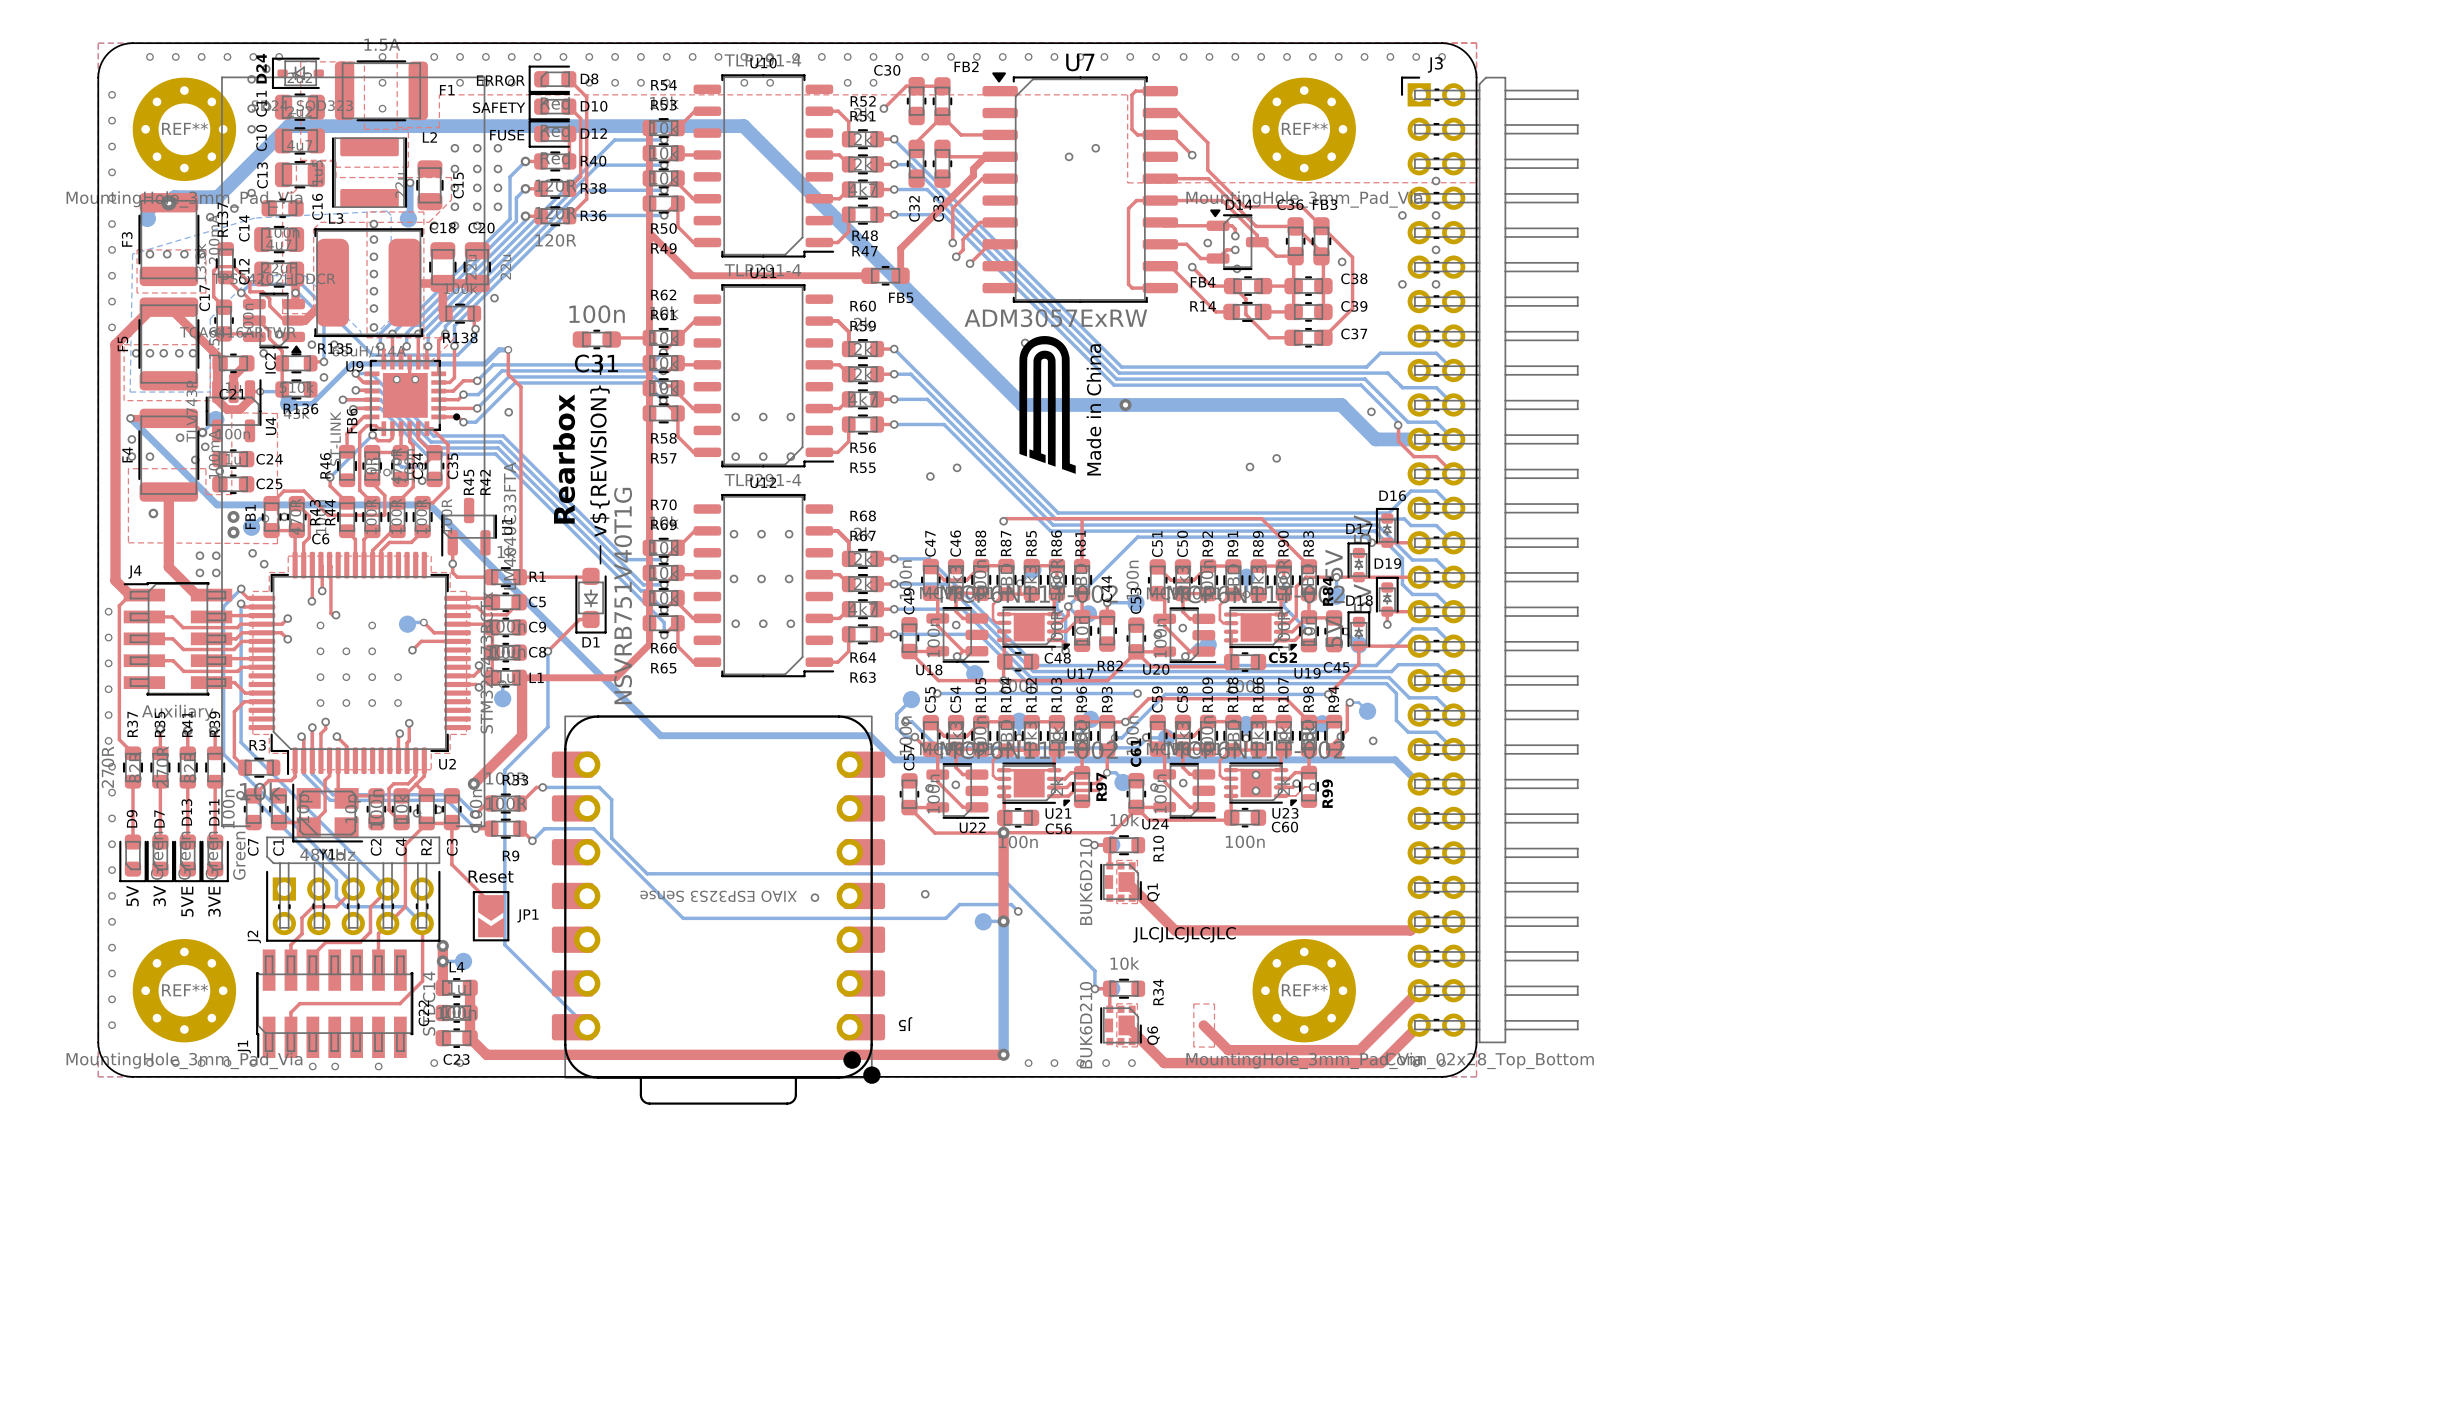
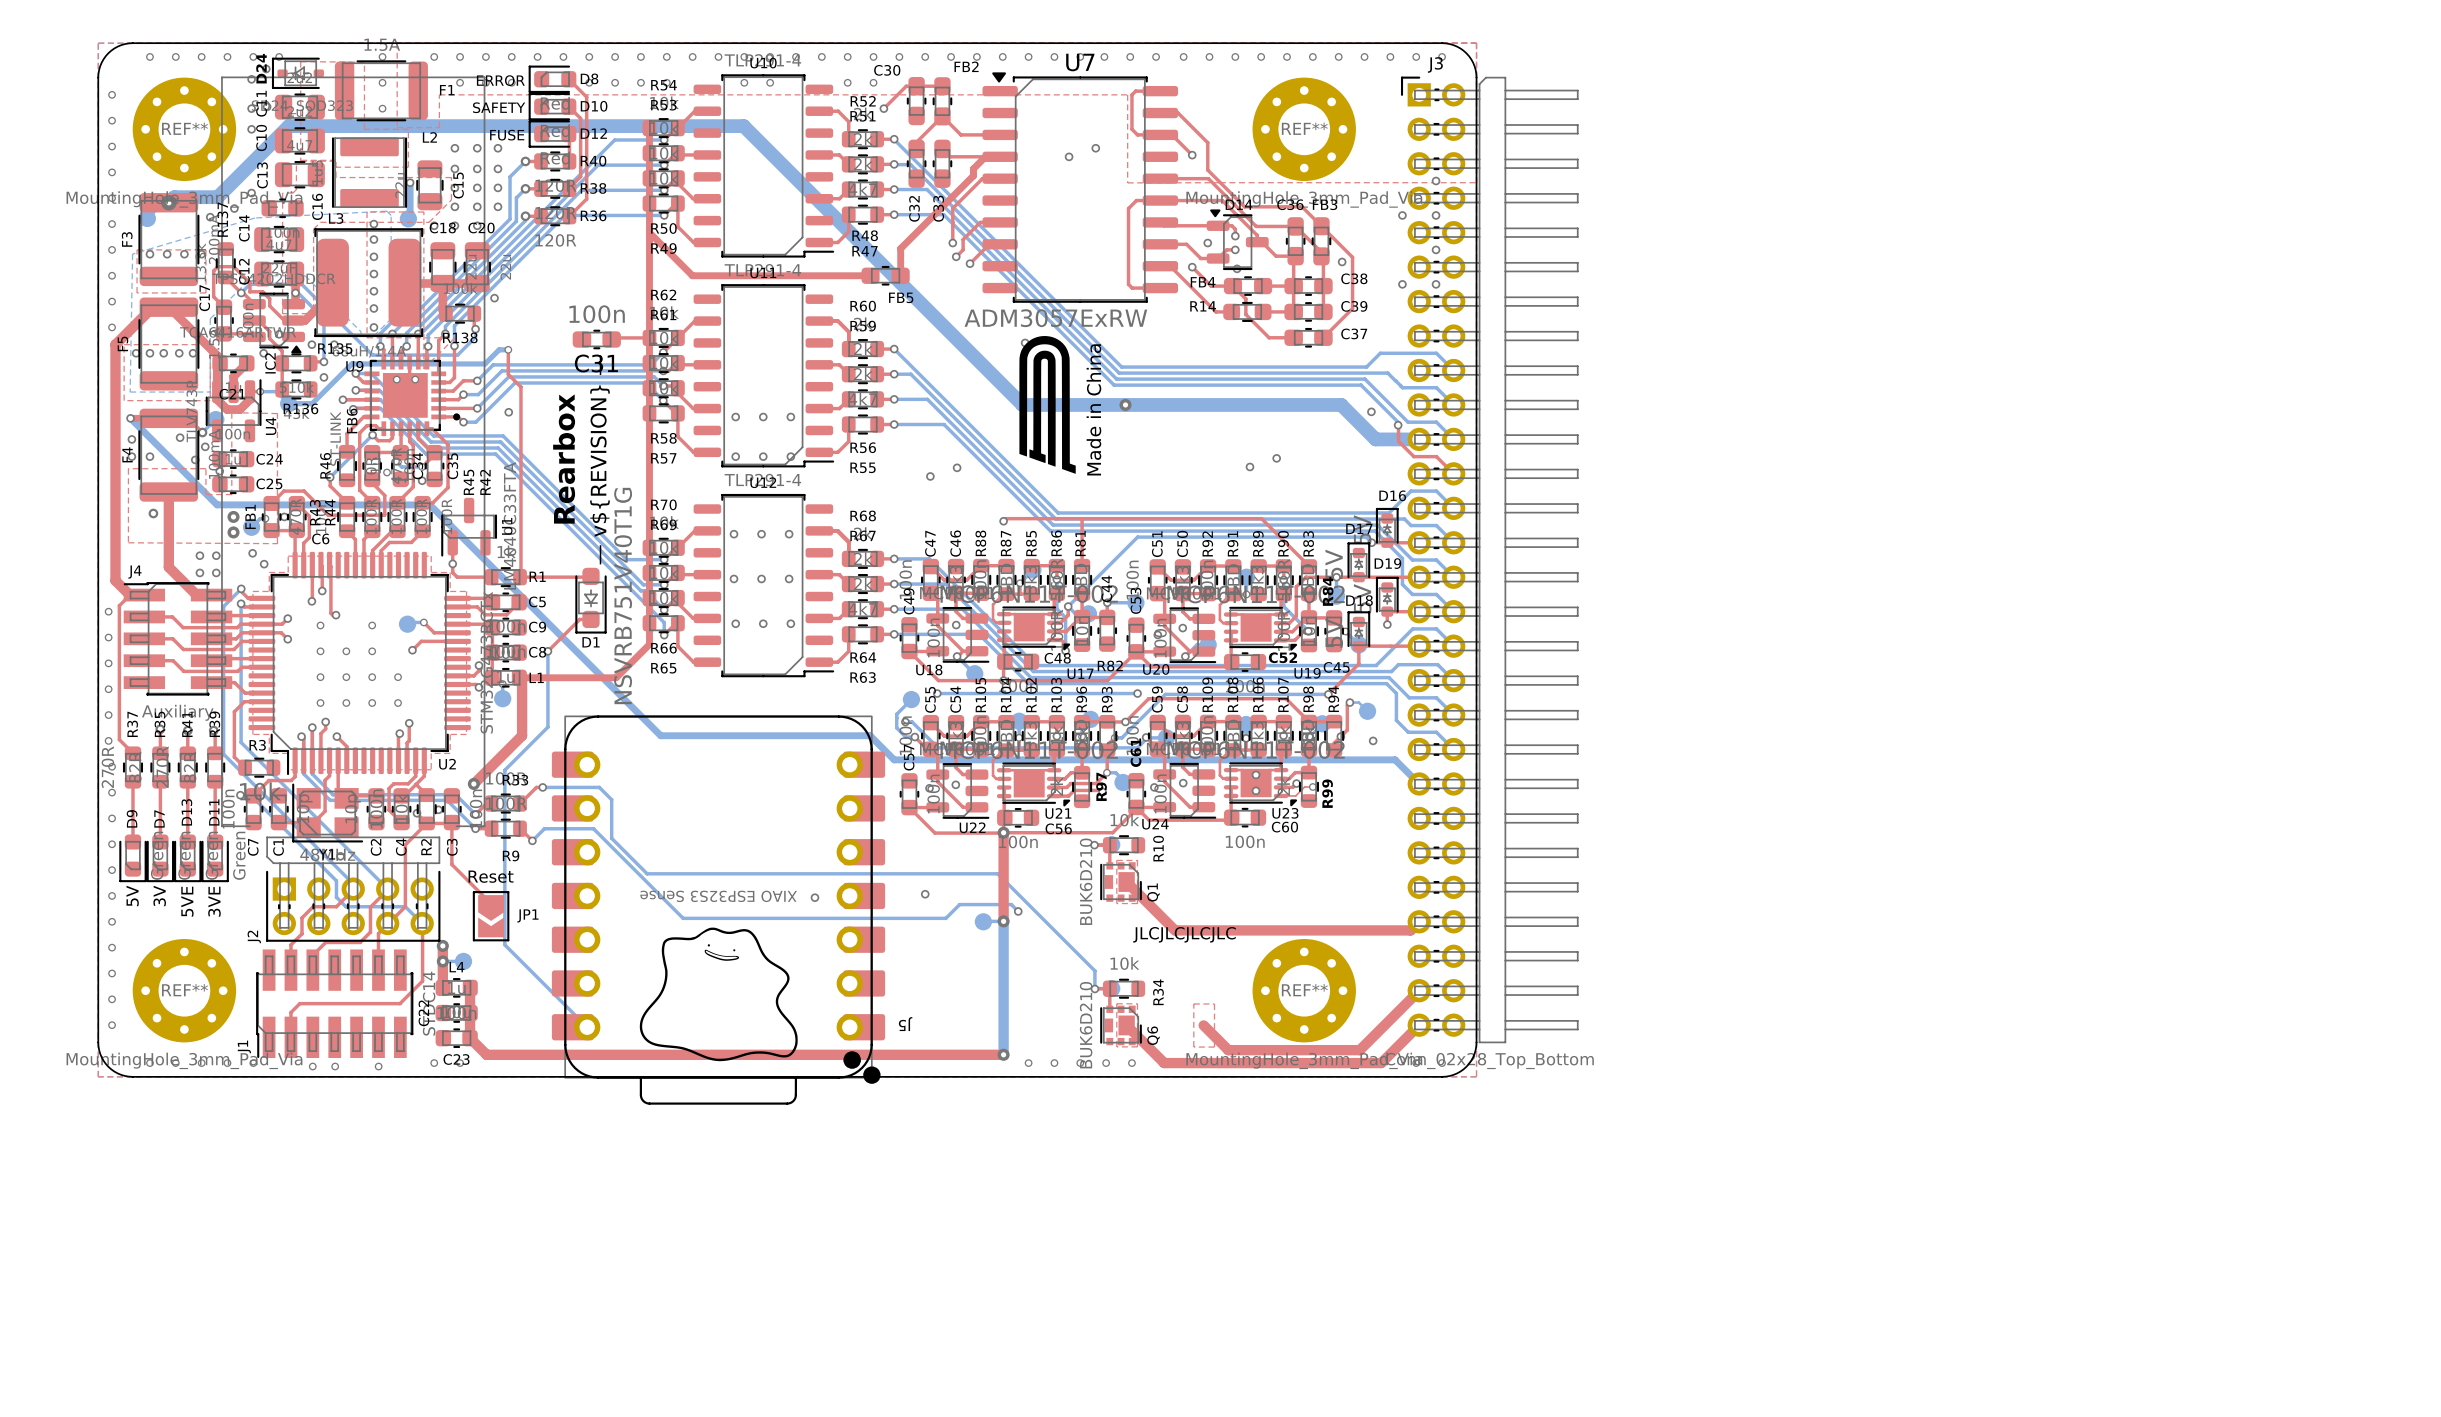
drawing: none -> [639, 927, 798, 1062]

